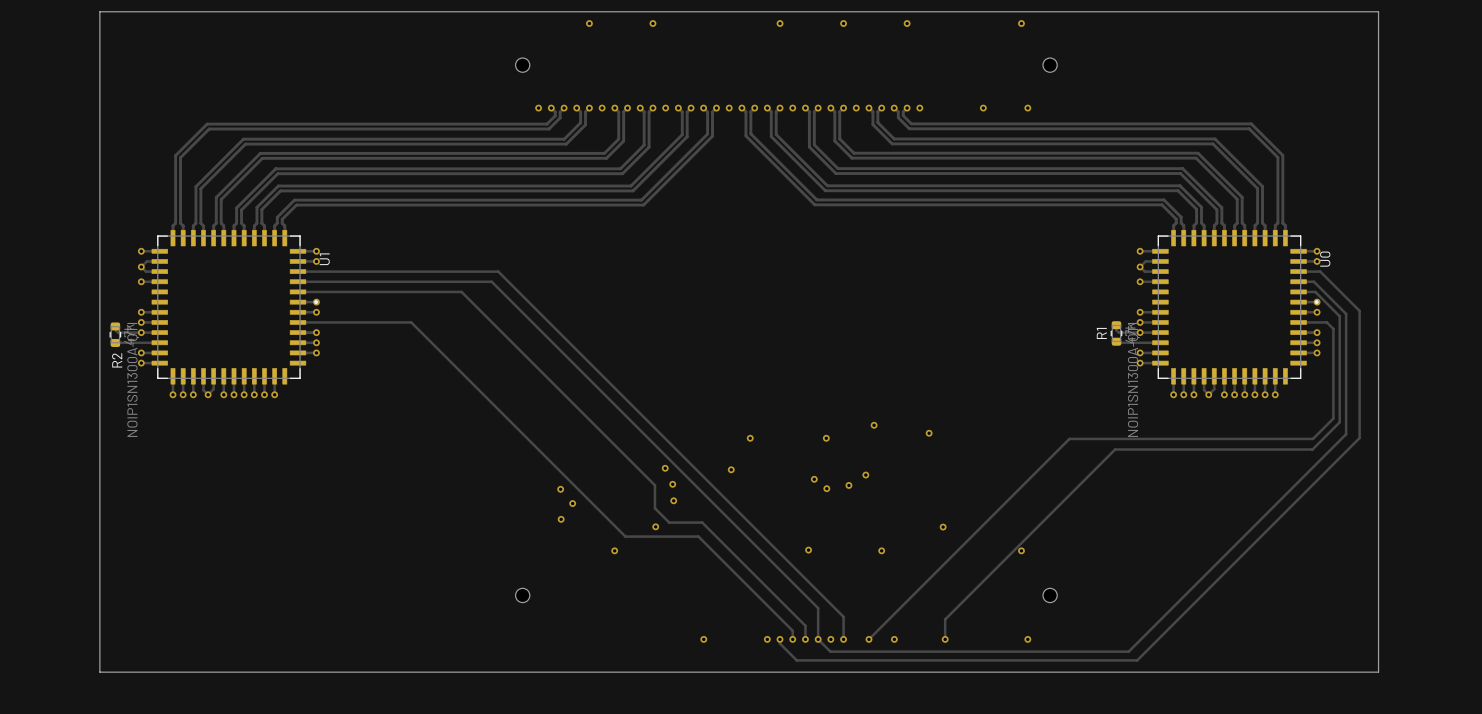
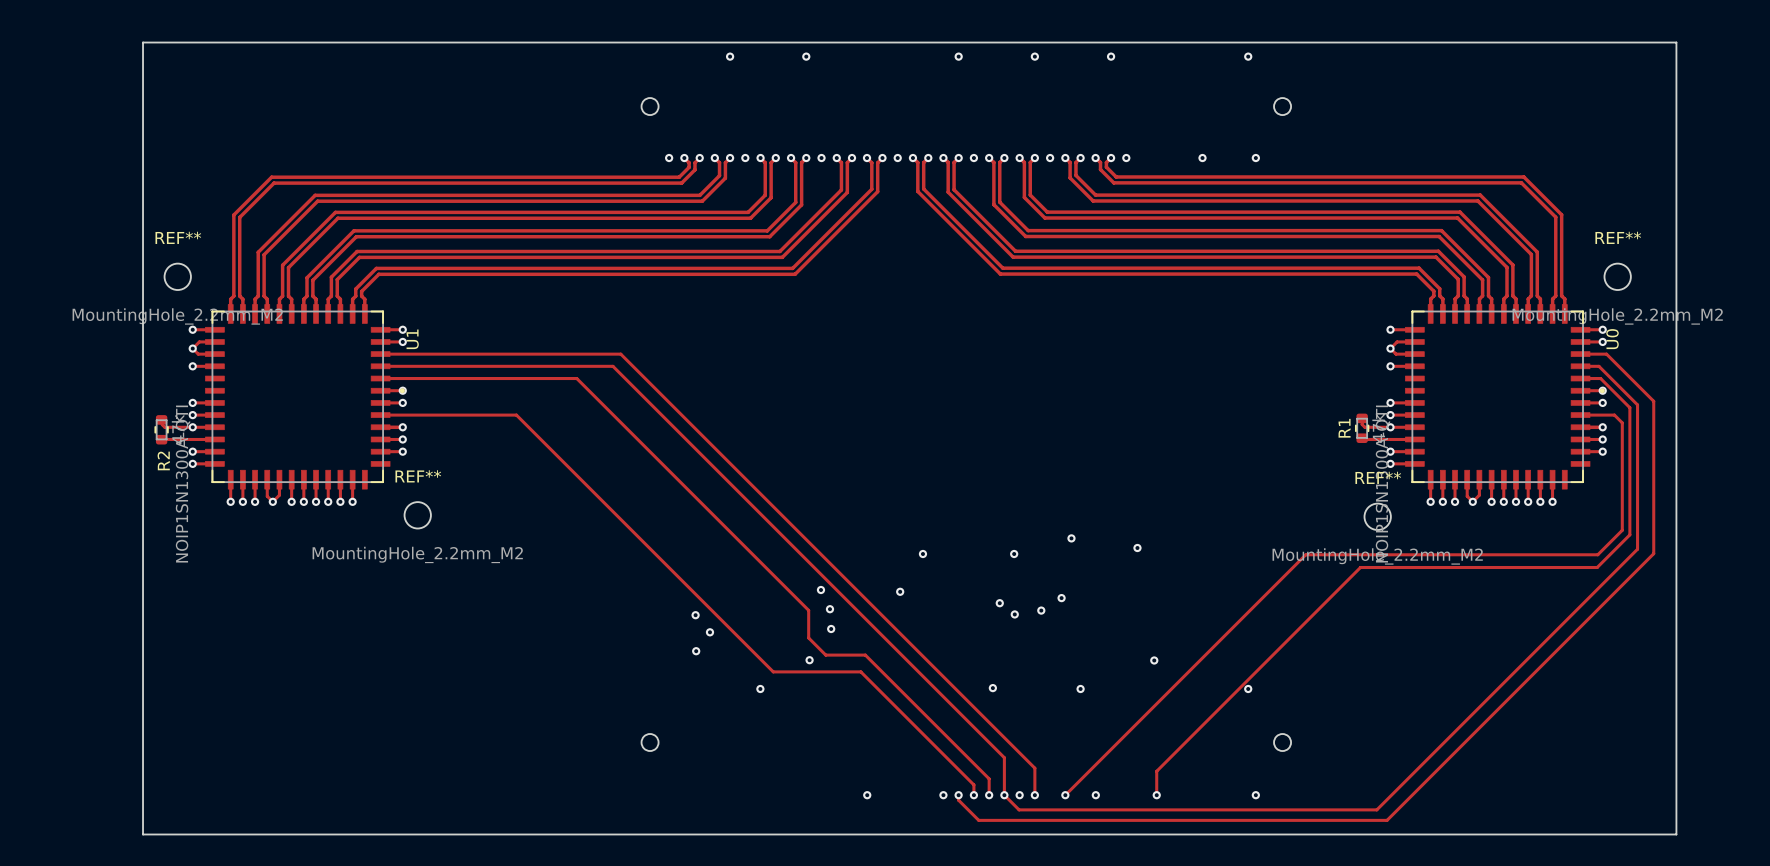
REF**: none -> MountingHole_2.2mm_M2 (177, 276)
REF**: none -> MountingHole_2.2mm_M2 (1617, 276)
REF**: none -> MountingHole_2.2mm_M2 (417, 515)
REF**: none -> MountingHole_2.2mm_M2 (1377, 516)

